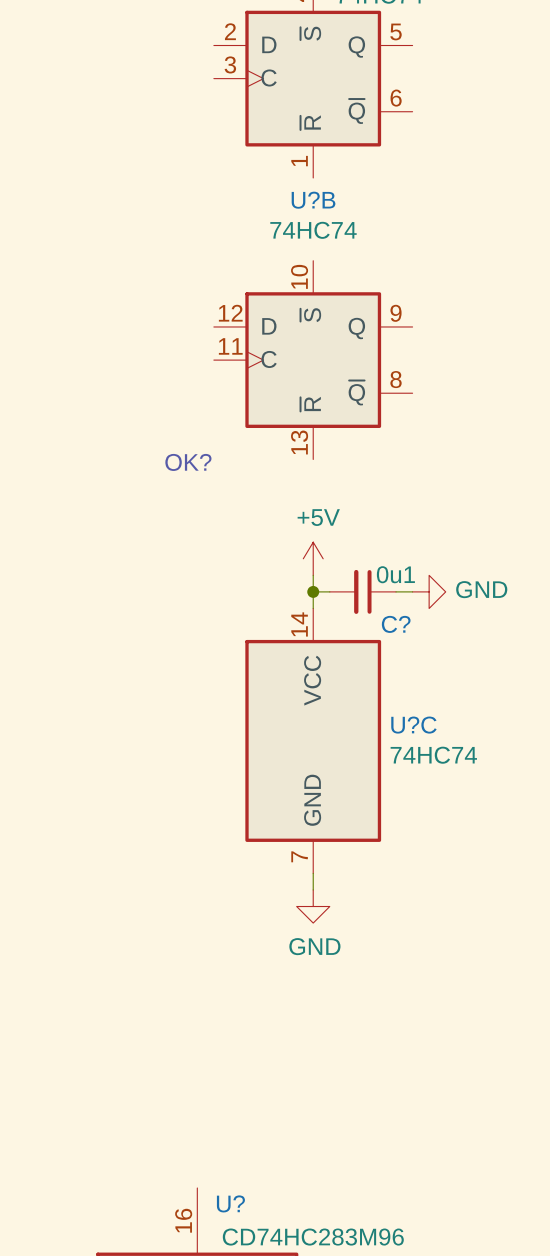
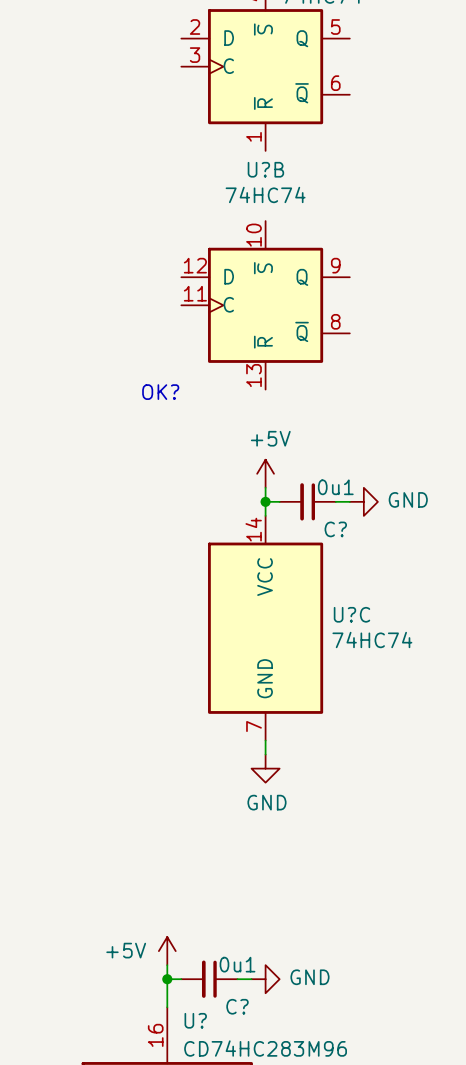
power symbol: none -> +5V (167, 951)
wire: none -> (167, 965) (167, 1007)
wire: none -> (167, 979) (181, 979)
junction: none -> (167, 979)
C?: none -> 0u1 (209, 979)
wire: none -> (237, 979) (251, 979)
power symbol: none -> GND (265, 979)

